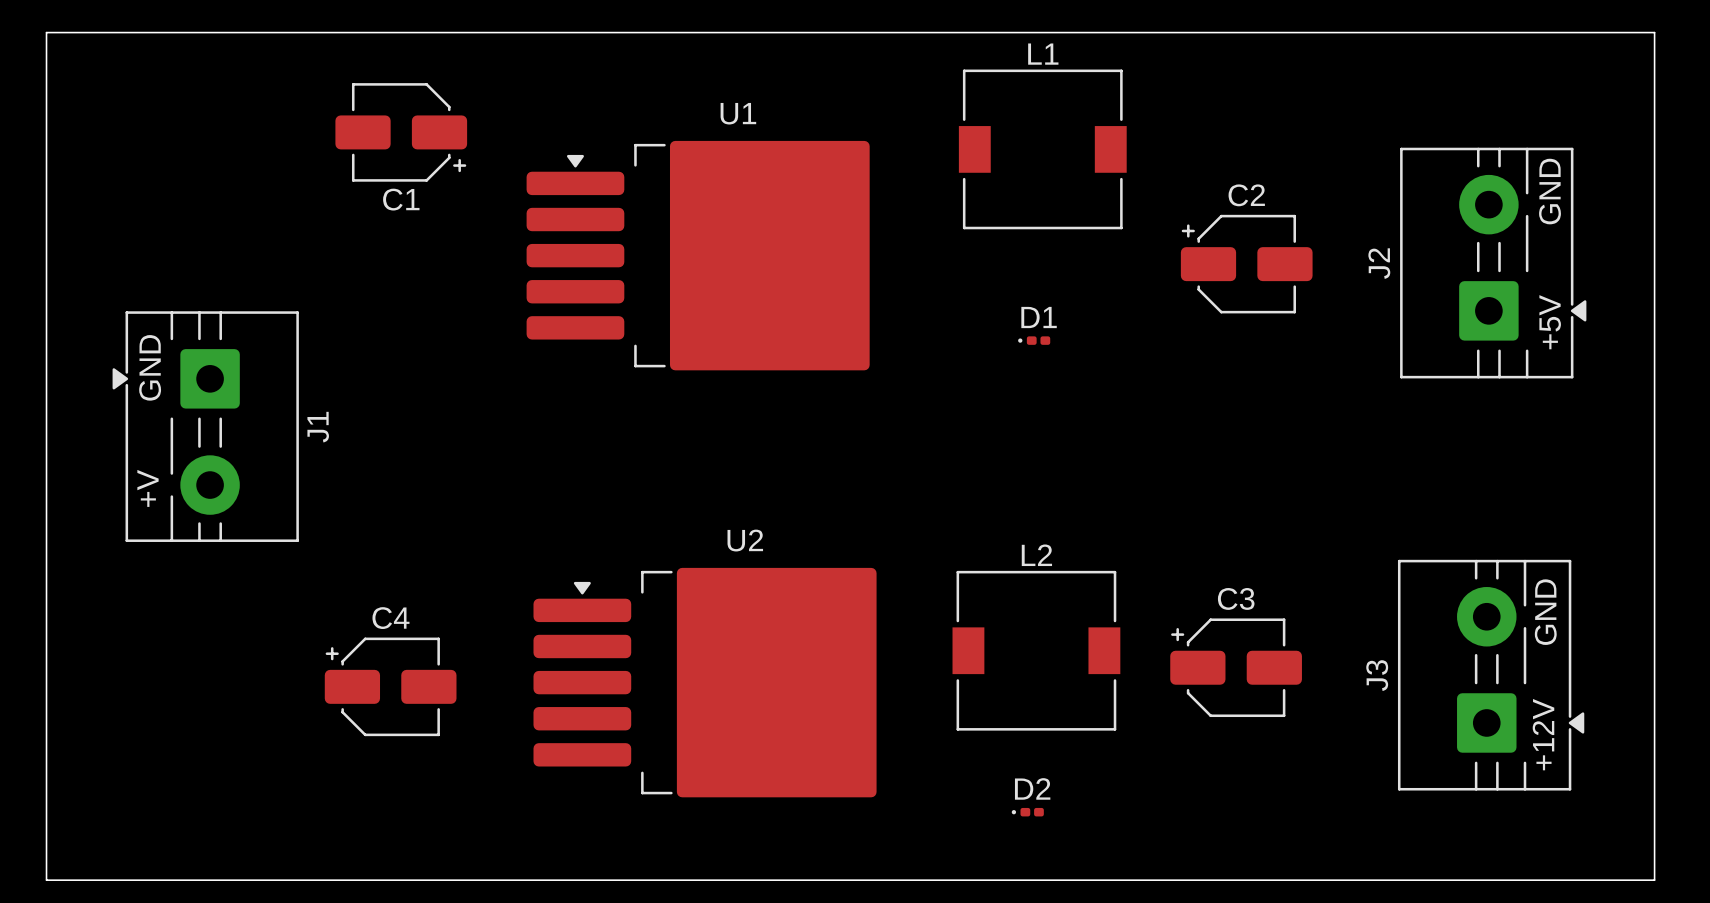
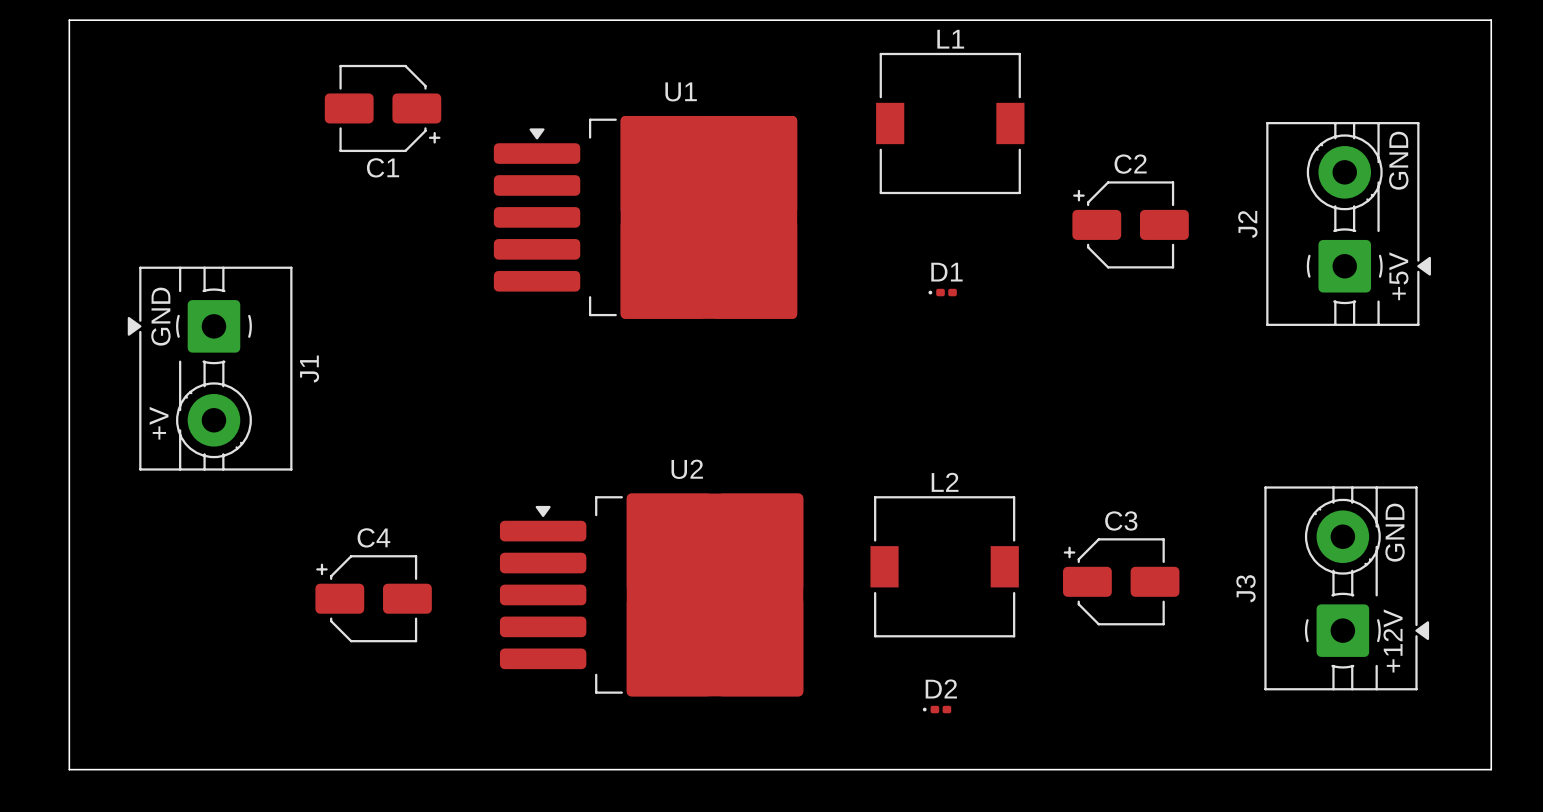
U1 footprint: [526, 140, 870, 371] -> [493, 115, 798, 319]
J2 footprint: [1400, 147, 1587, 379] -> [1266, 121, 1431, 326]
J1 footprint: [112, 311, 299, 542] -> [127, 266, 293, 471]
J3 footprint: [1397, 559, 1585, 791] -> [1264, 486, 1430, 691]
U2 footprint: [533, 567, 877, 798] -> [499, 493, 804, 697]

